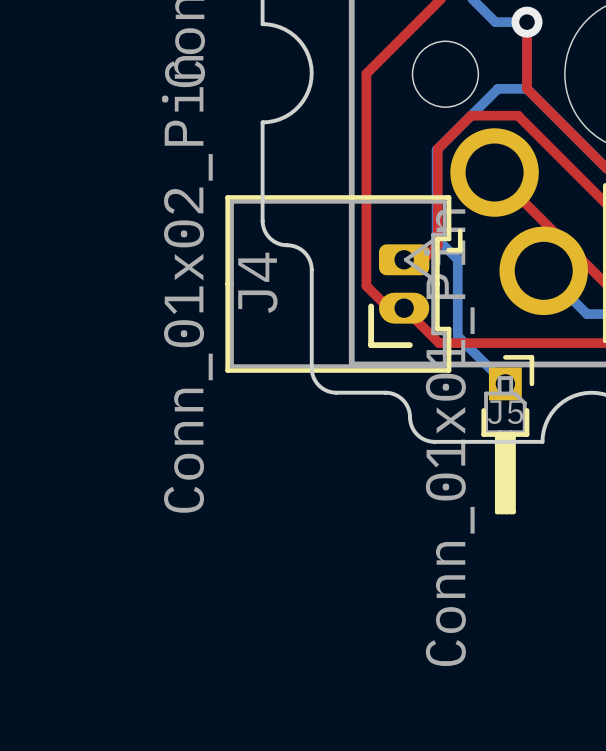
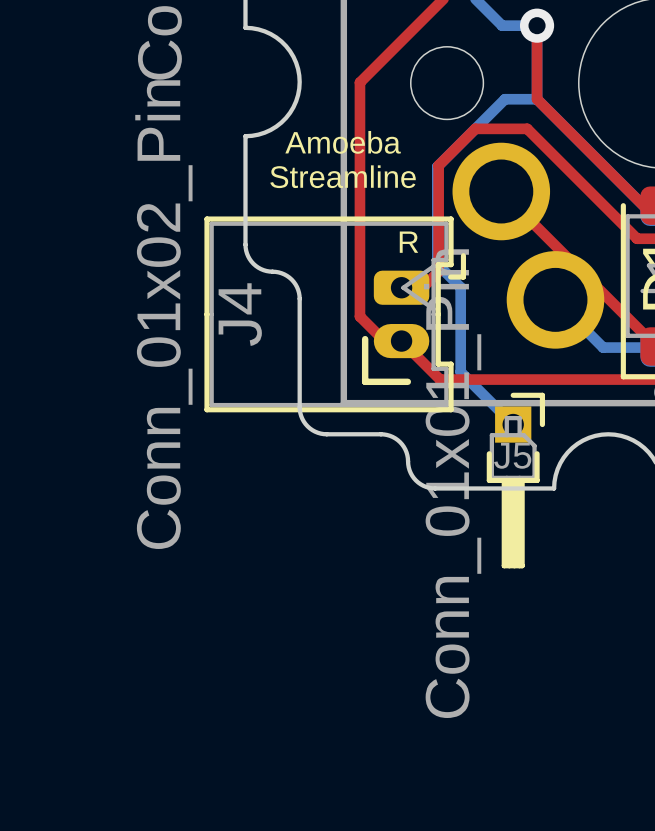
text: none -> Amoeba (343, 142)
text: none -> Streamline (343, 176)
text: none -> R (408, 242)

